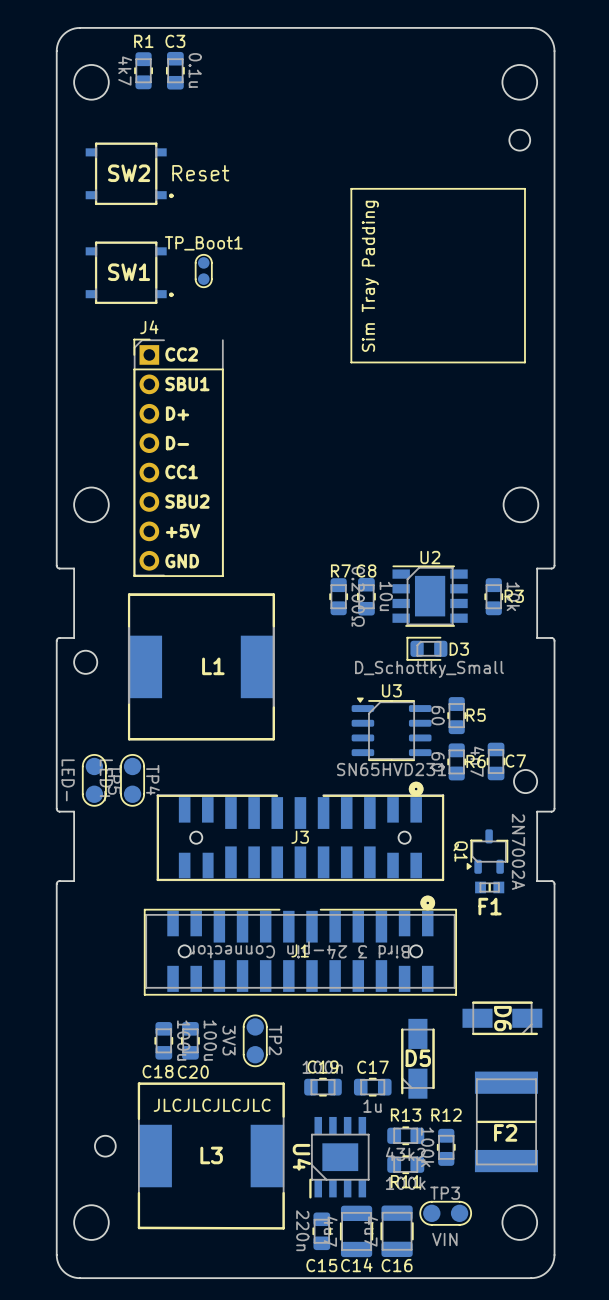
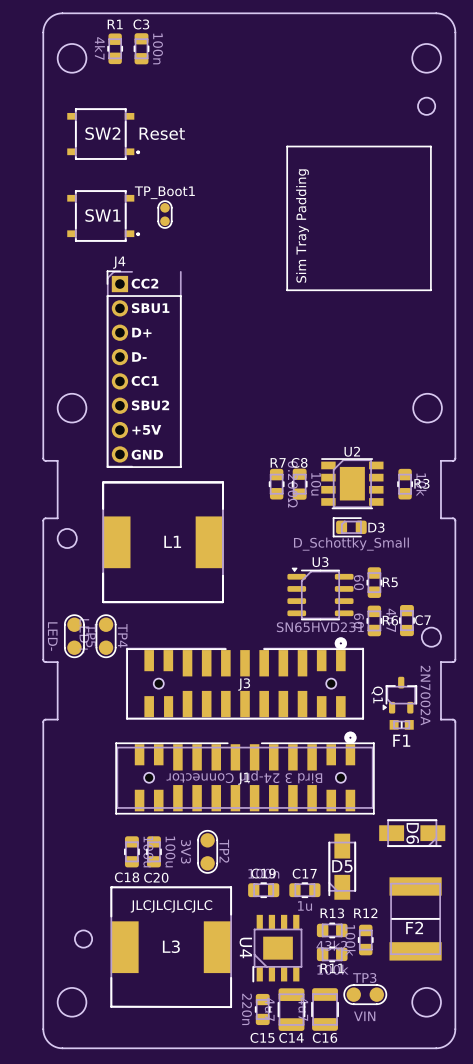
C3 value: 0.1u (195, 70) -> 100n (157, 48)

